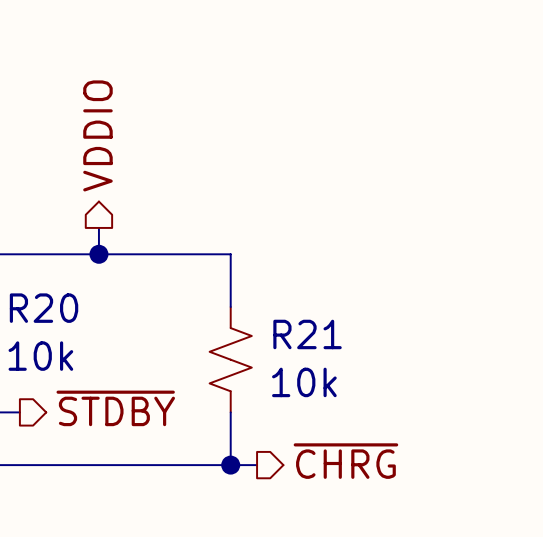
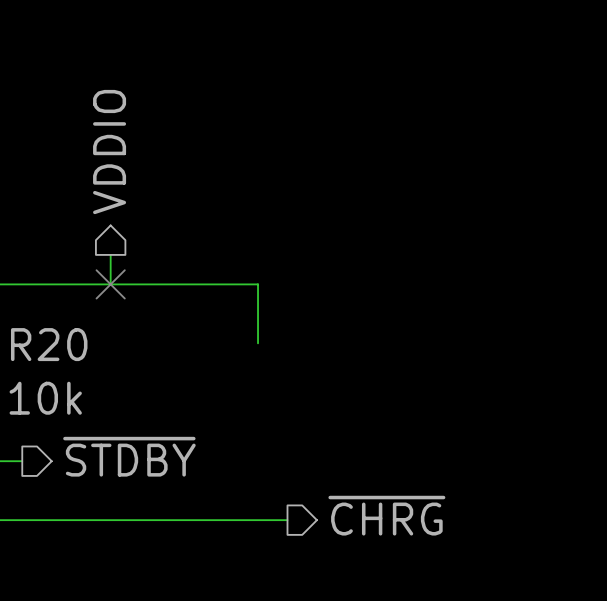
junction: (98, 254) -> none
no-connect mark: none -> (110, 284)
R21: 10k (230, 359) -> none
wire: (230, 412) (230, 465) -> none
junction: (230, 465) -> none

